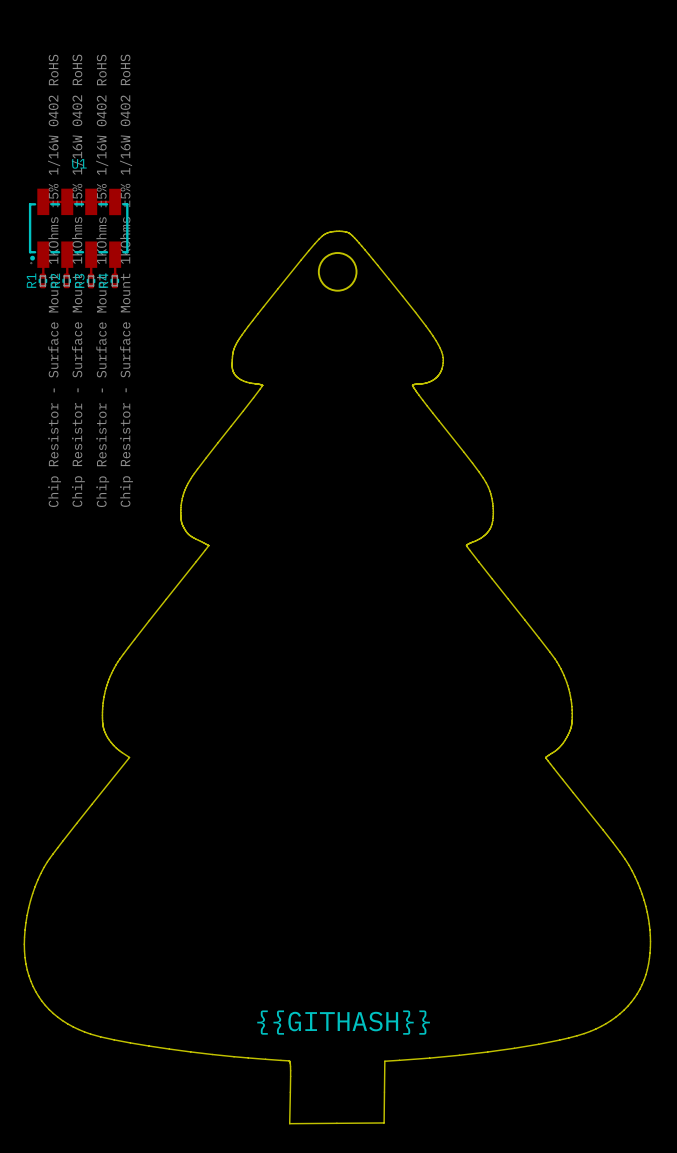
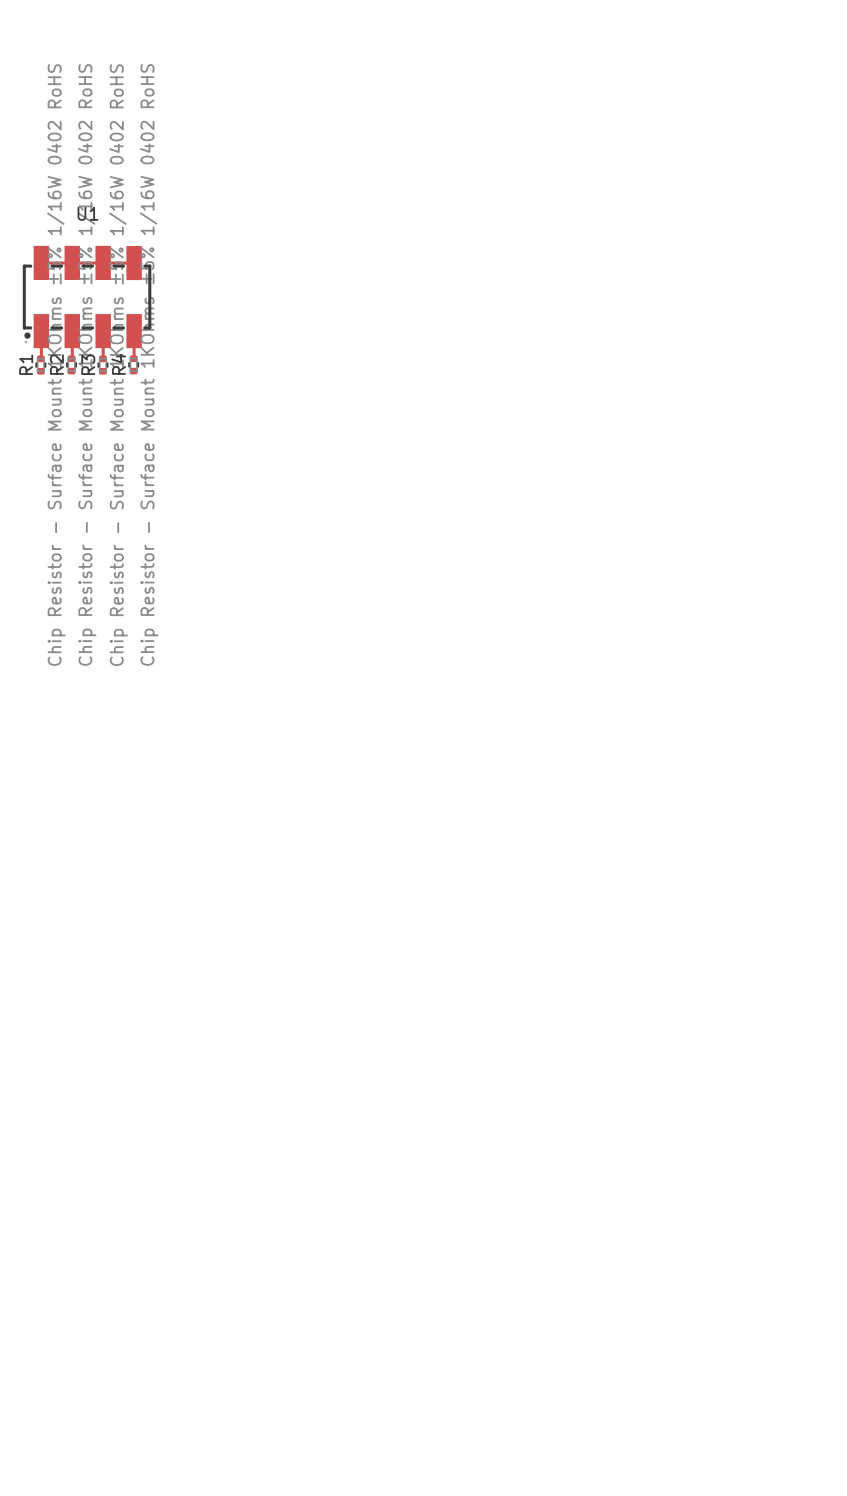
round board edge: [317, 252, 358, 292] -> none
board edge: (262, 385) (243, 380) (234, 373) (232, 360) (235, 345) (252, 320) (314, 243) (324, 234) (338, 231) (348, 232) (359, 243) (415, 312) (440, 348) (443, 362) (438, 374) (429, 381) (412, 385) -> none
board edge: (262, 385) (194, 473) (183, 494) (180, 512) (183, 526) (190, 535) (208, 545) -> none
board edge: (412, 385) (478, 471) (490, 491) (493, 508) (491, 526) (483, 536) (466, 545) -> none
board edge: (208, 545) (128, 647) (112, 670) (104, 696) (103, 726) (111, 743) (129, 757) (47, 861) (37, 880) (30, 900) (24, 944) (28, 975) (41, 1001) (53, 1013) (67, 1023) (90, 1034) (130, 1042) (212, 1054) (289, 1060) (289, 1123) (384, 1122) (384, 1061) (514, 1048) (568, 1037) (601, 1026) (627, 1006) (637, 993) (644, 979) (650, 947) (647, 912) (637, 882) (625, 859) (545, 757) -> none
board edge: (466, 545) (549, 652) (565, 678) (571, 703) (571, 727) (561, 745) (545, 757) -> none
text: {{GITHASH}} (343, 1022) -> none

